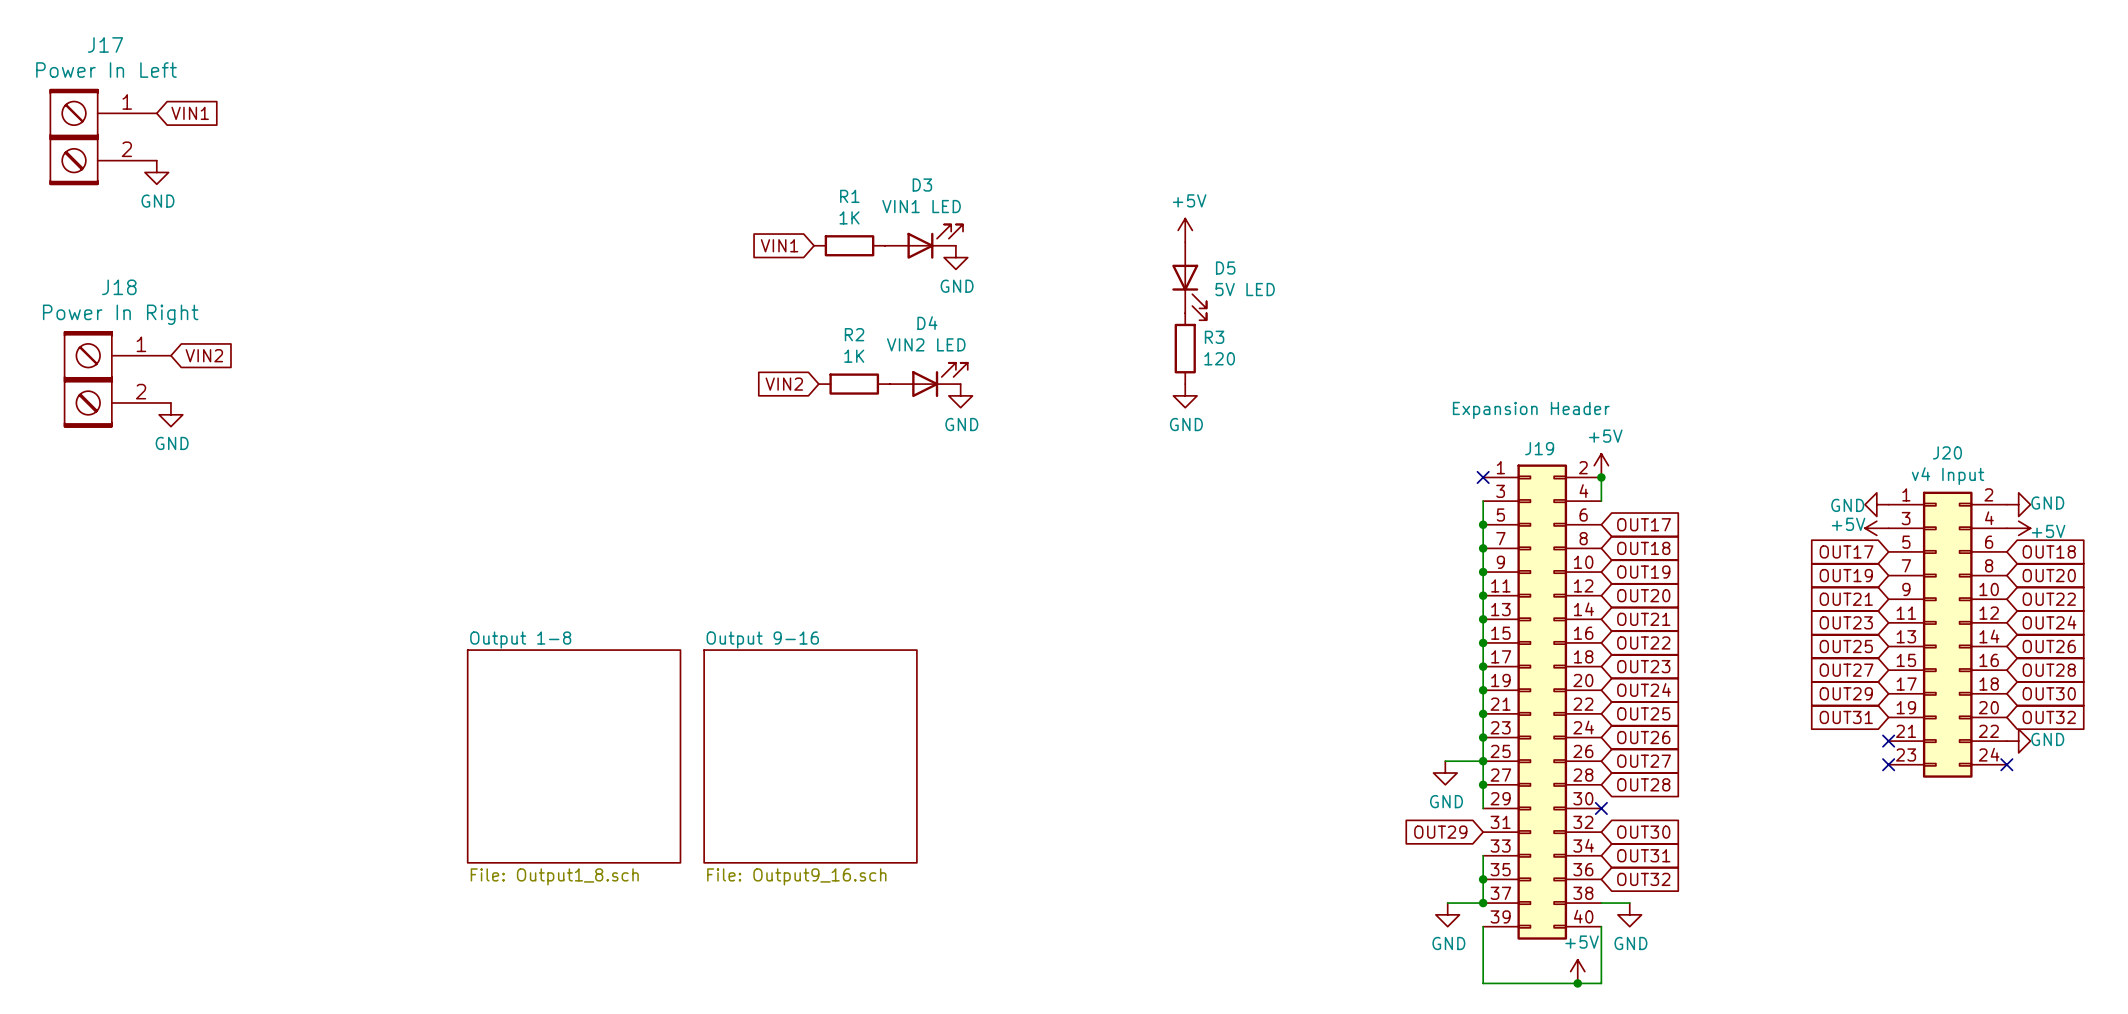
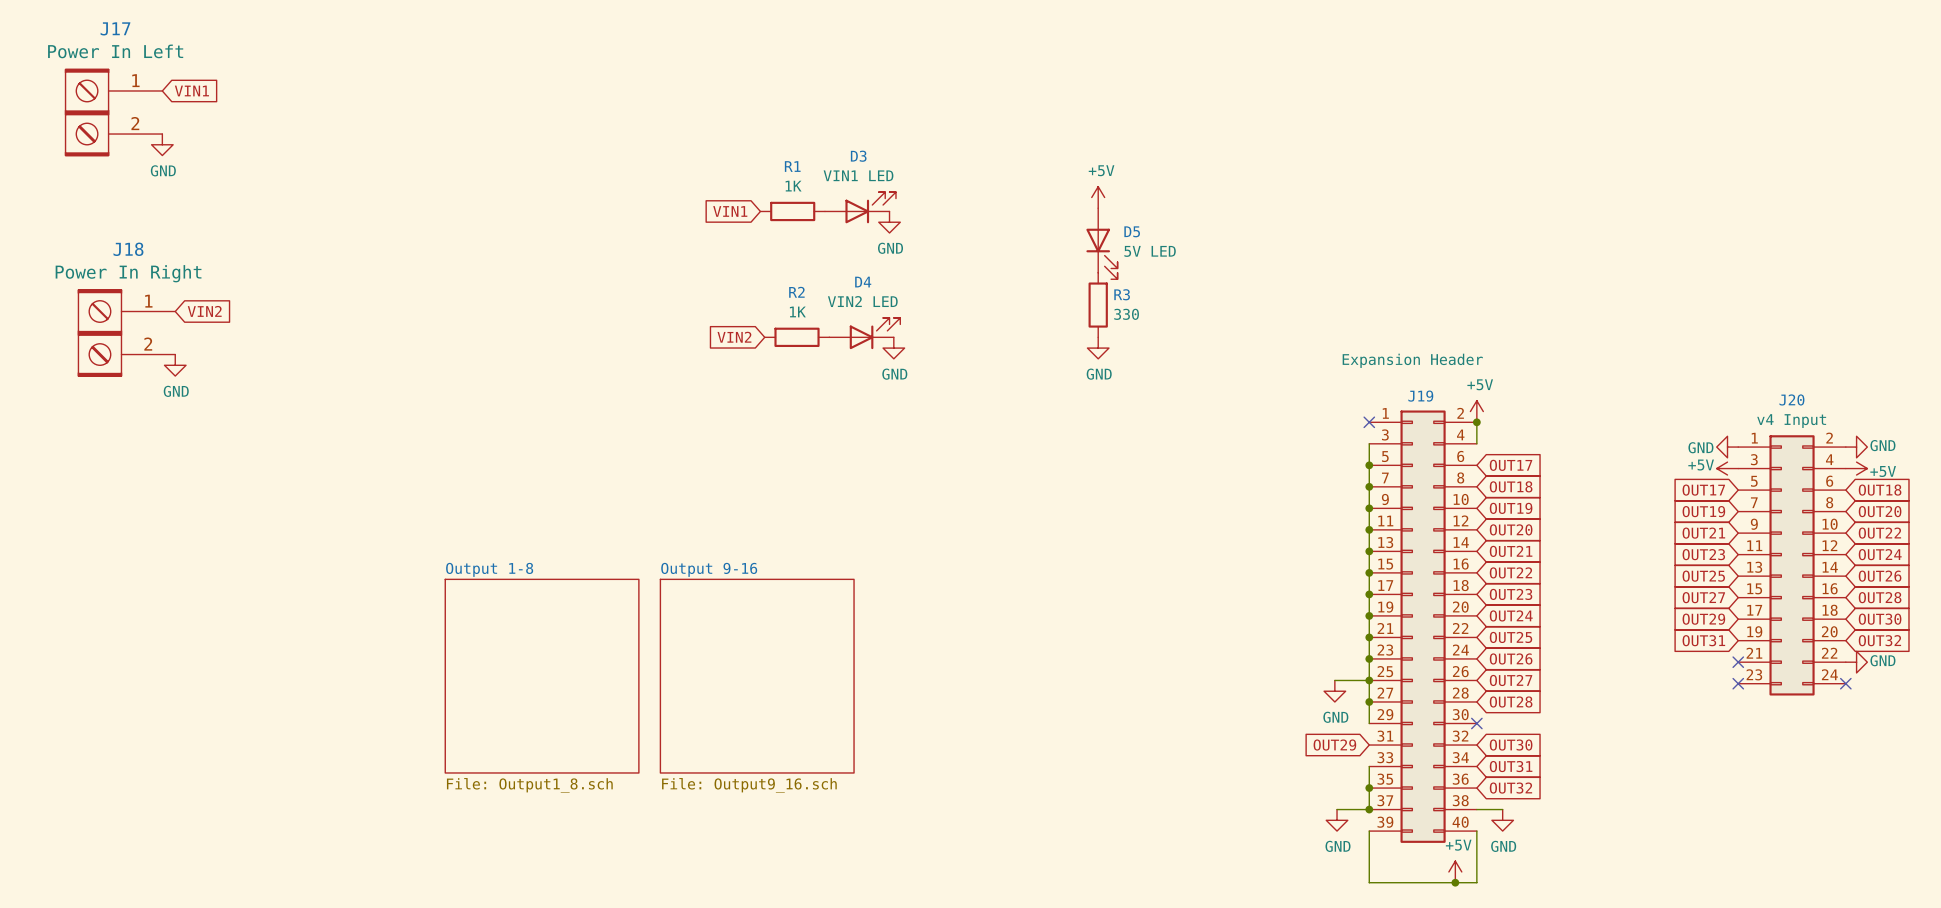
R3 value: 120 (1219, 358) -> 330 (1126, 314)

